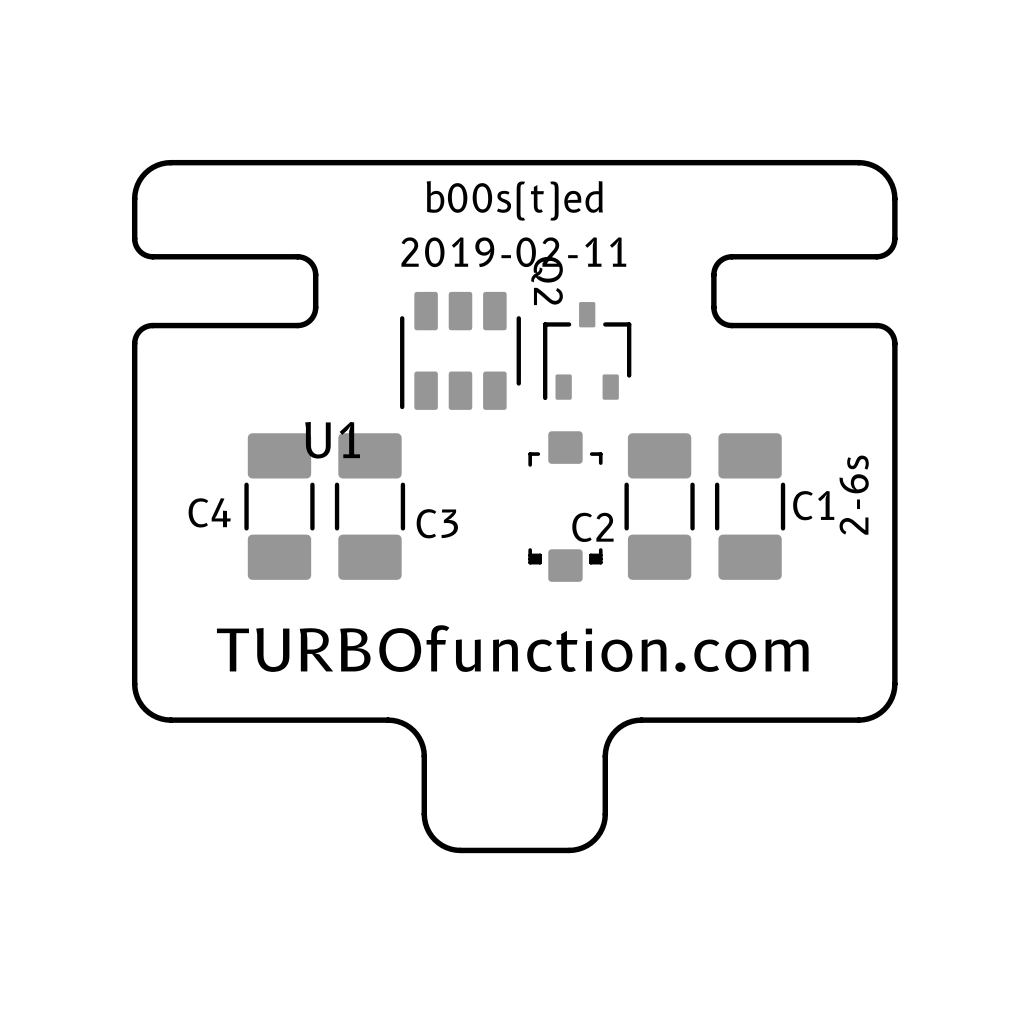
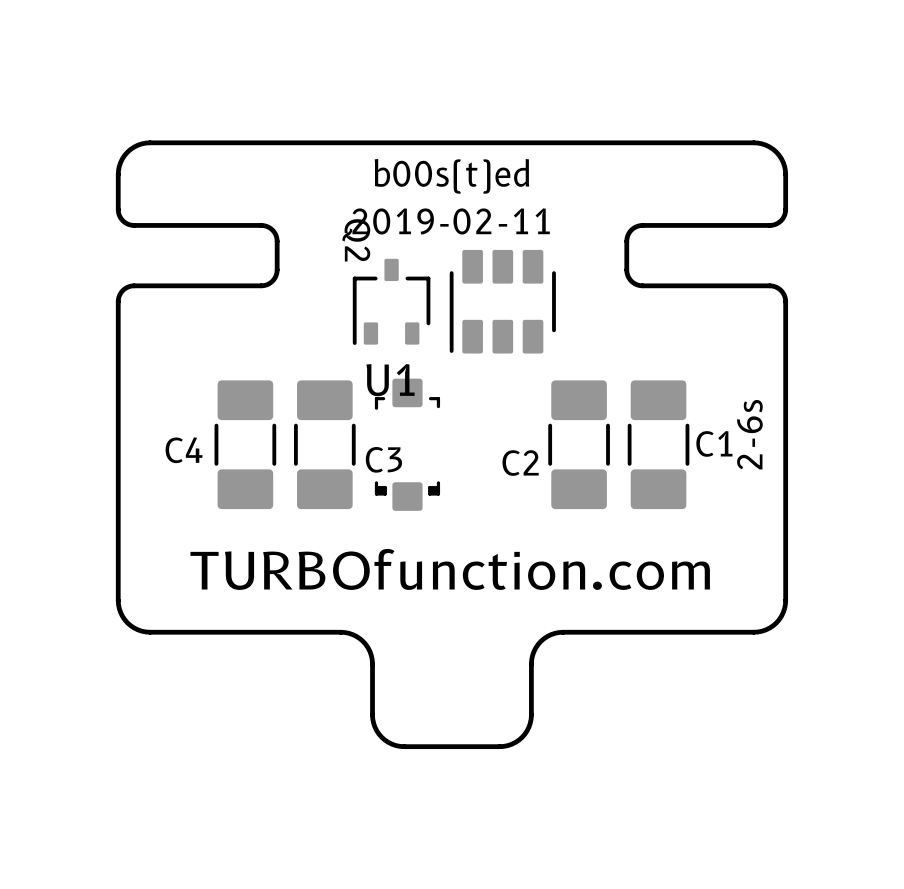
U1 position: (460, 350) -> (502, 301)
Q2 position: (587, 351) -> (391, 301)
part position: (565, 506) -> (407, 444)

